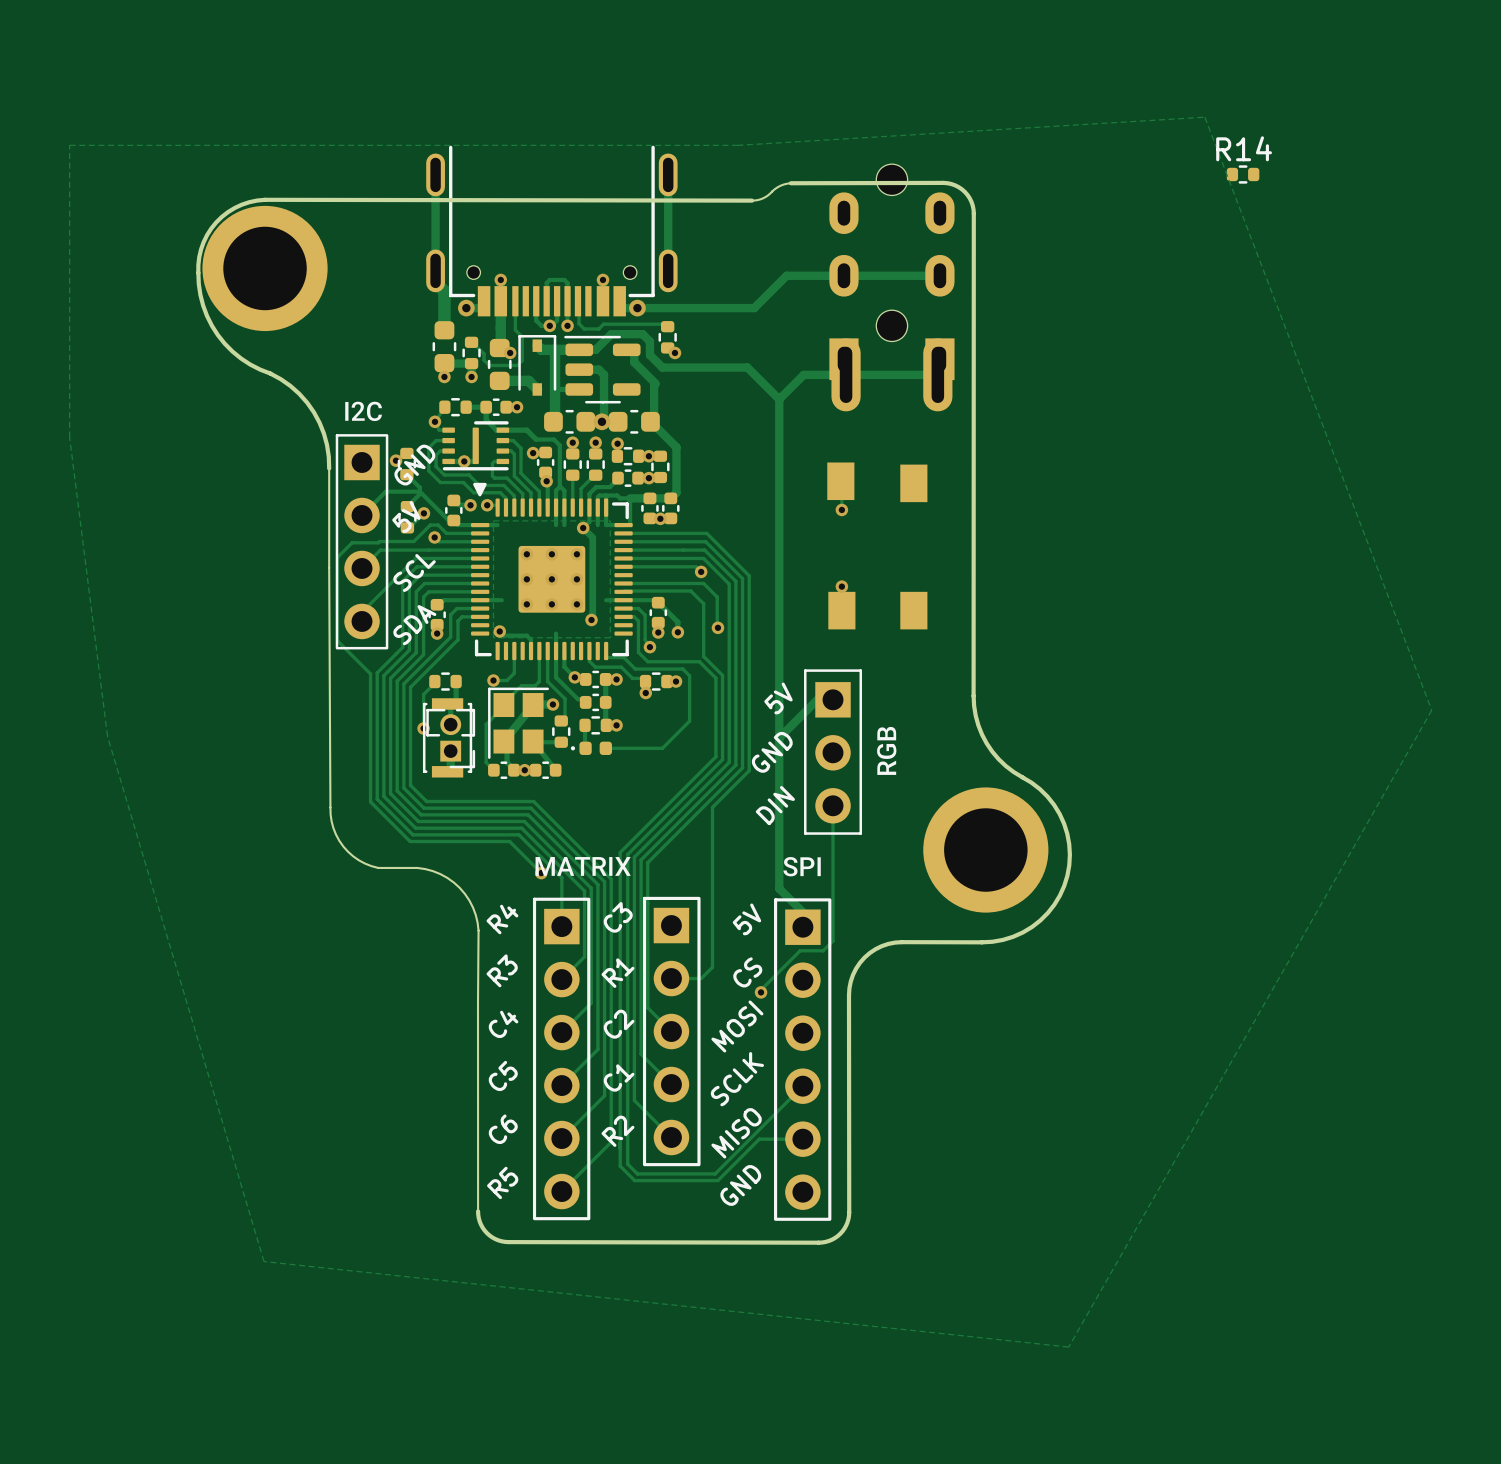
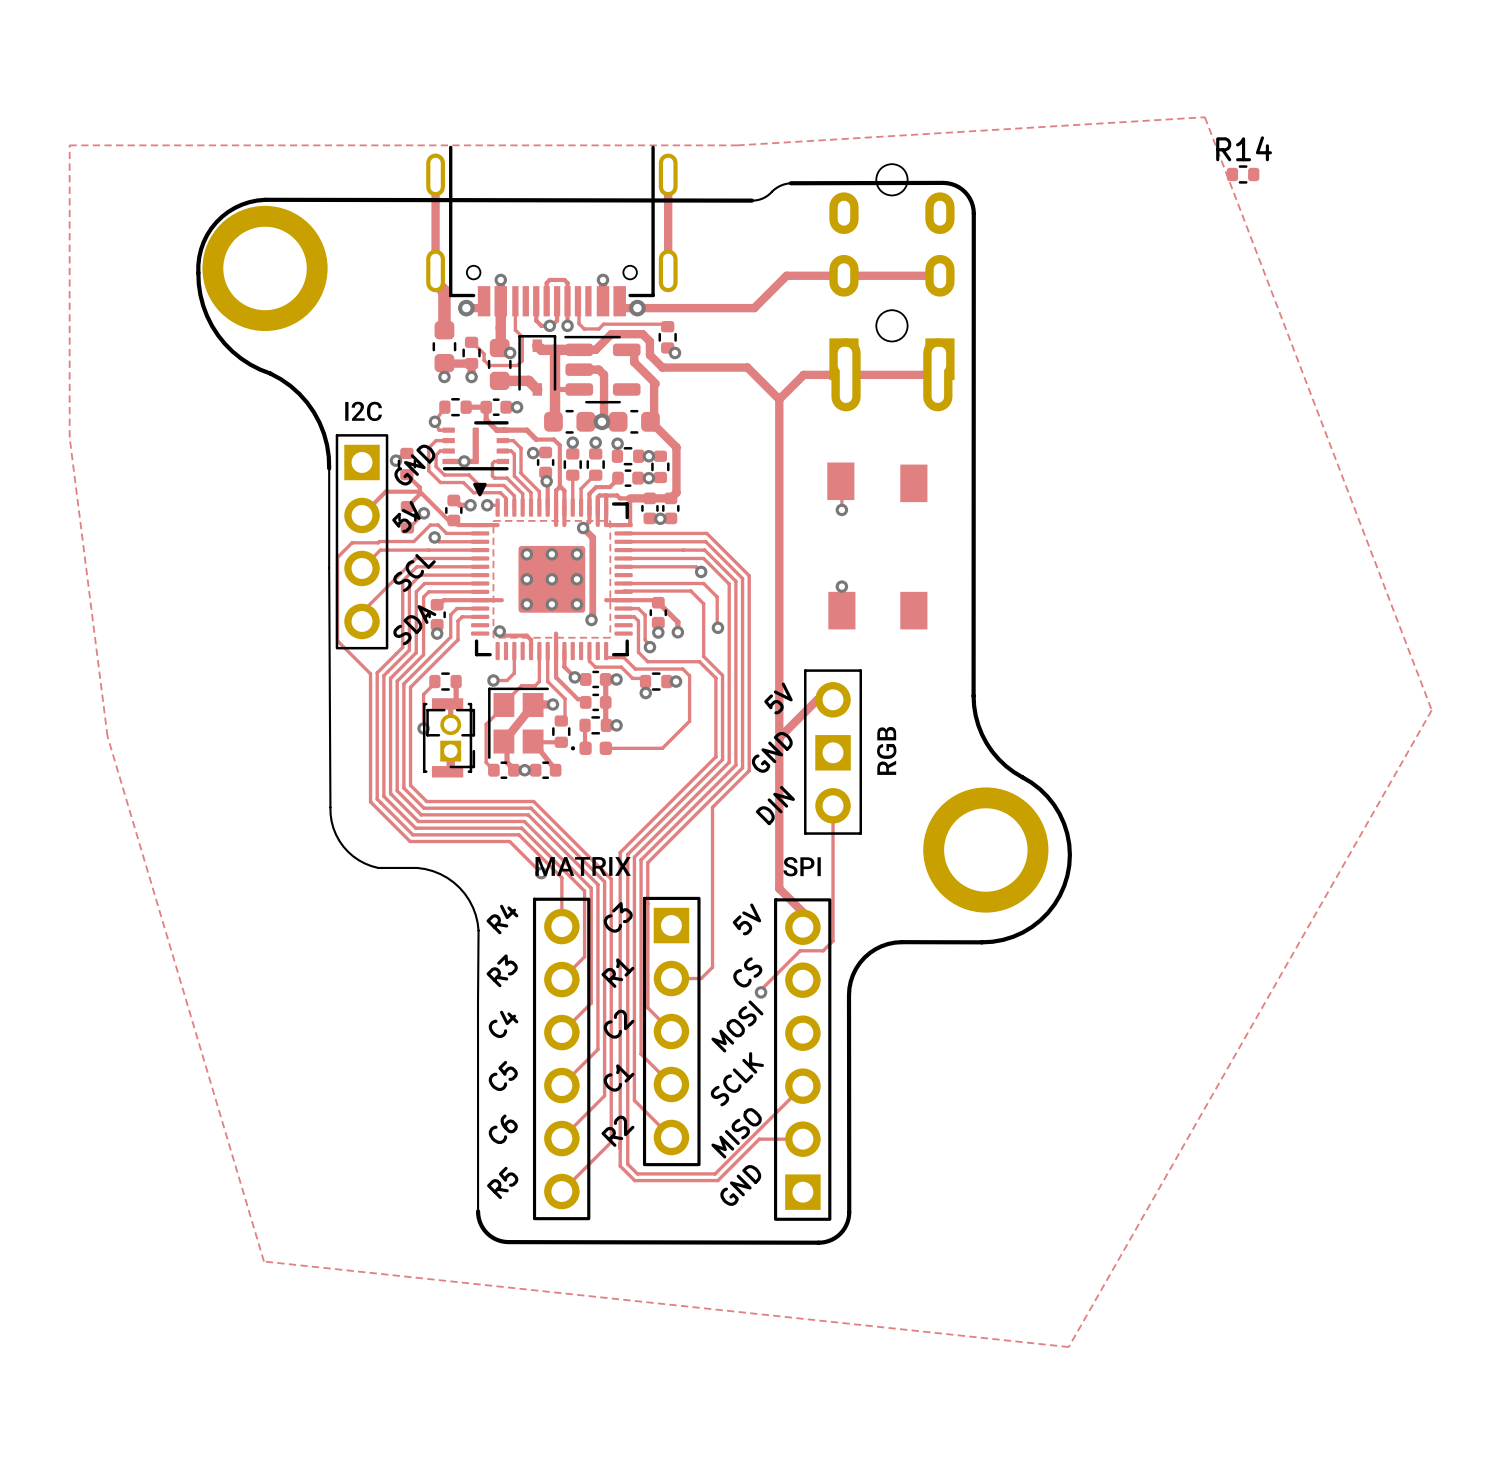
part footprint: [804, 669, 863, 835] -> [804, 669, 863, 835]
part footprint: [532, 897, 591, 1221] -> [532, 897, 591, 1221]
part rotation: 0° (802, 1059) -> 180° (802, 1059)

